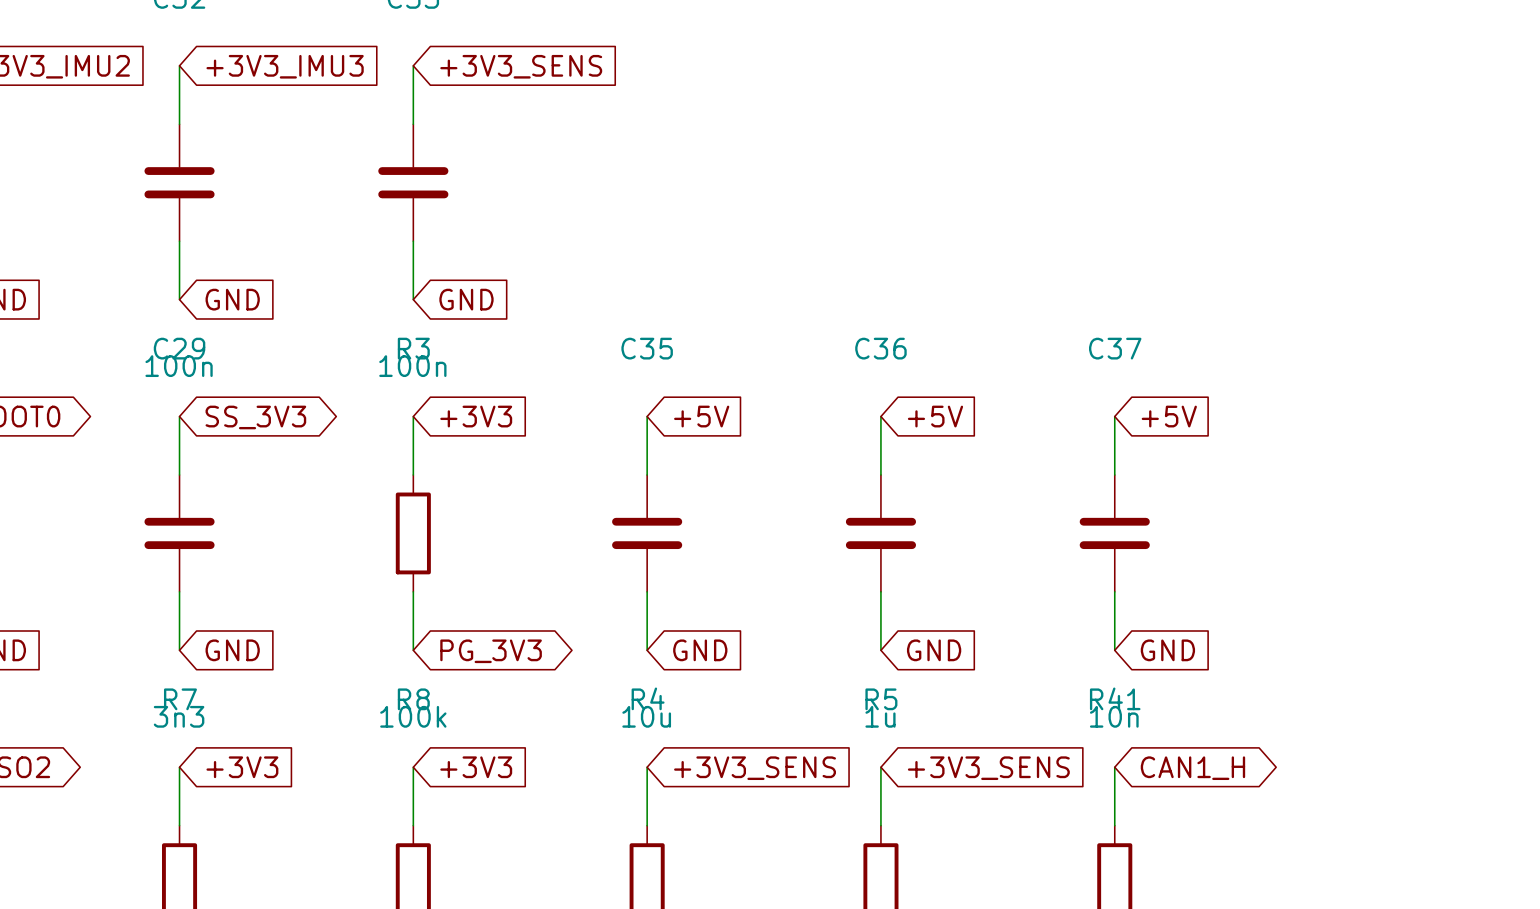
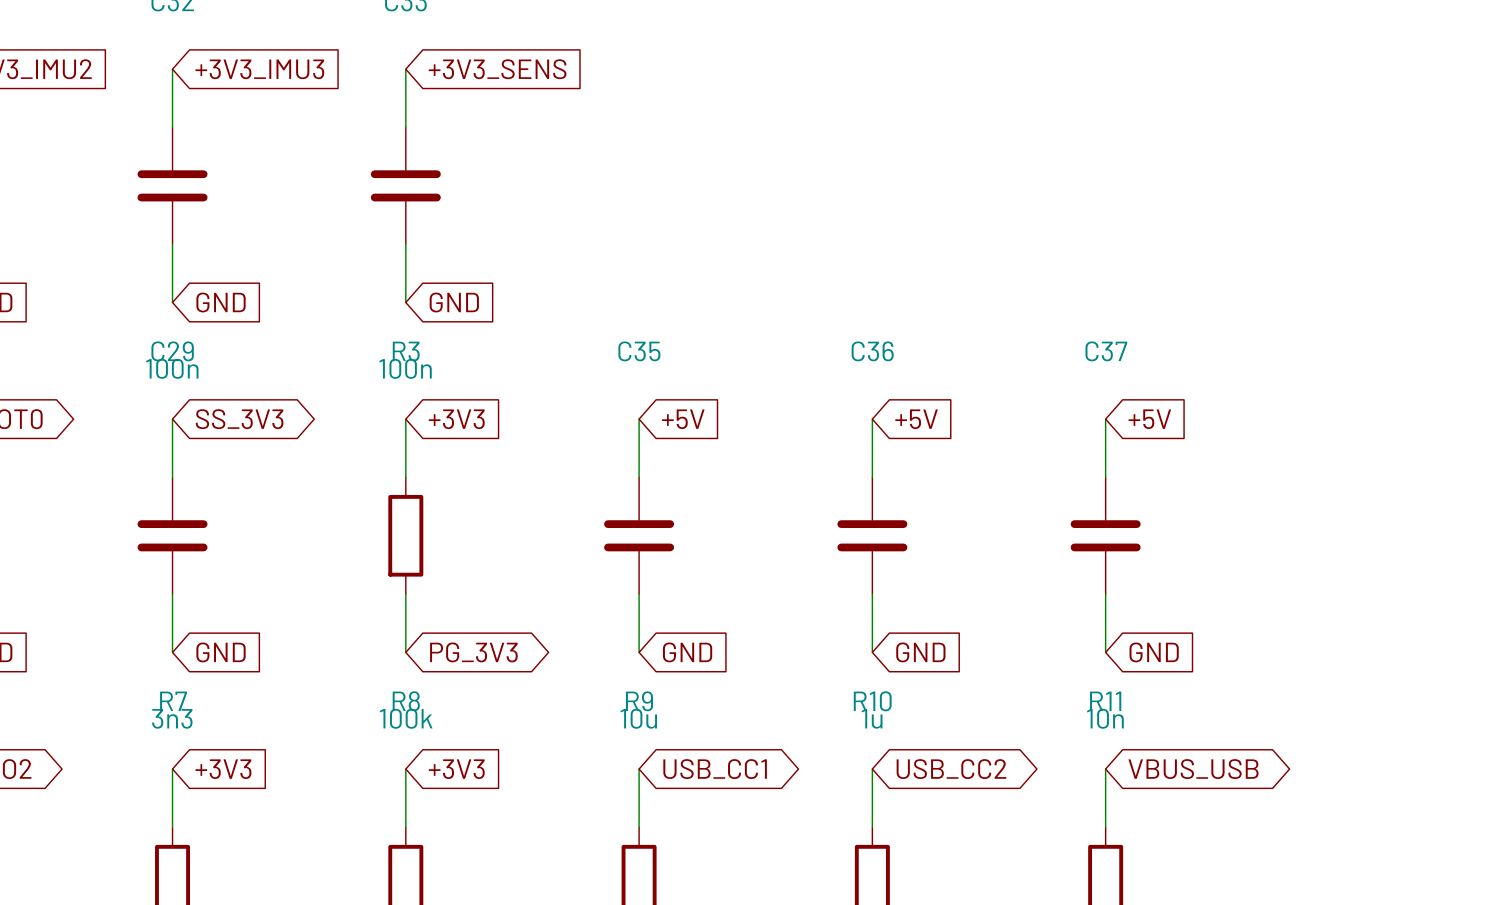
R4 name: R4 (648, 698) -> R9 (639, 701)
R41 name: R41 (1115, 698) -> R11 (1105, 701)
R5 name: R5 (881, 699) -> R10 (872, 701)
global label shape: input (755, 768) -> bidirectional (715, 769)
global label: +3V3_SENS (755, 768) -> USB_CC1 (715, 769)
global label shape: input (988, 768) -> bidirectional (951, 769)
global label: +3V3_SENS (988, 768) -> USB_CC2 (951, 769)
global label: CAN1_H (1192, 768) -> VBUS_USB (1193, 769)

